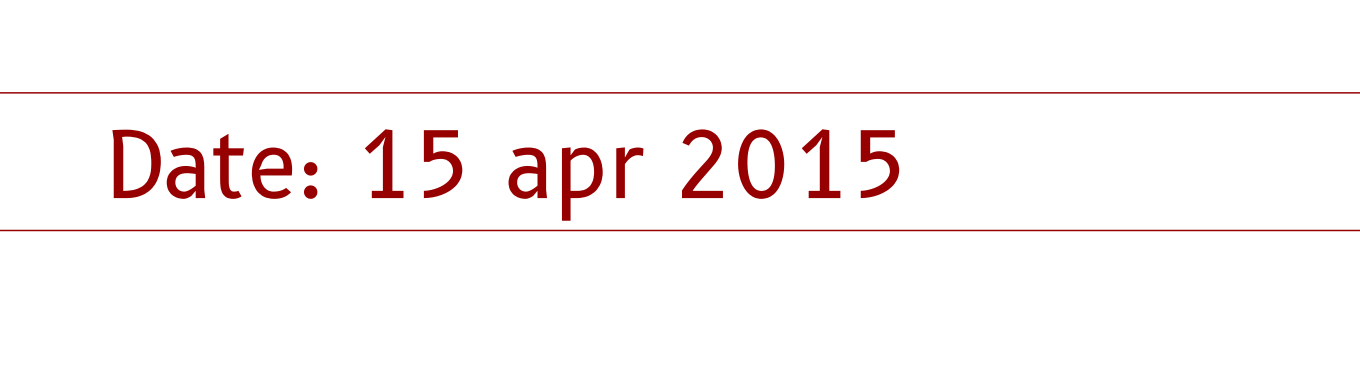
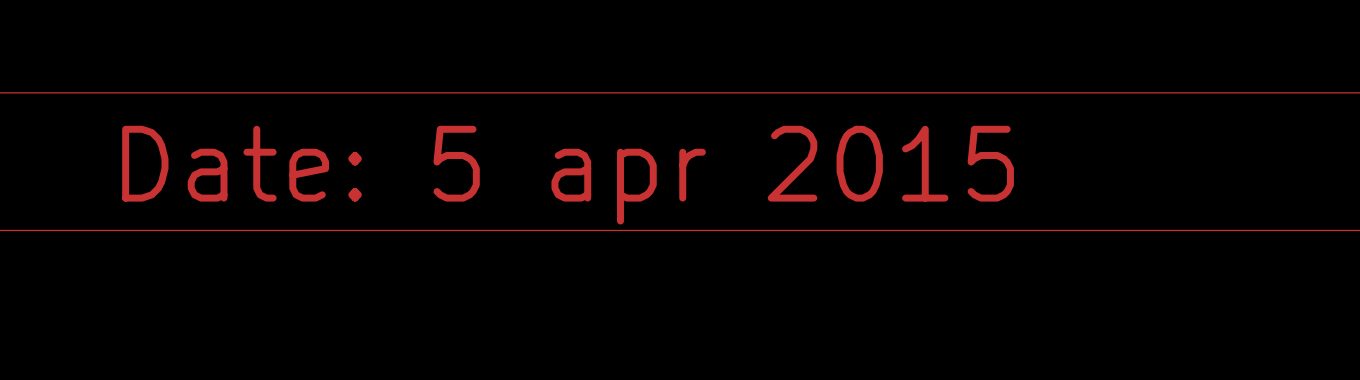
title block: Date: 15 apr 2015 (505, 175) -> Date: 5 apr 2015 (568, 175)

